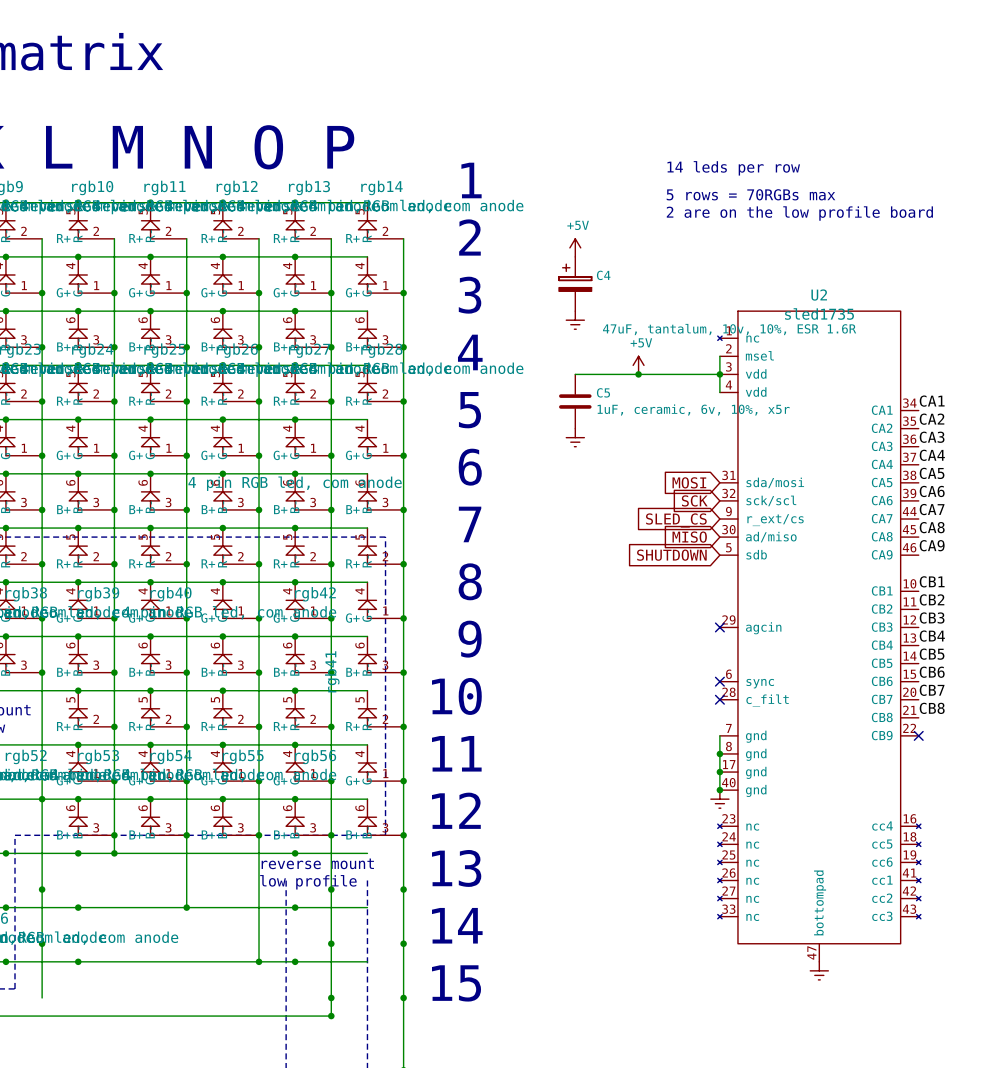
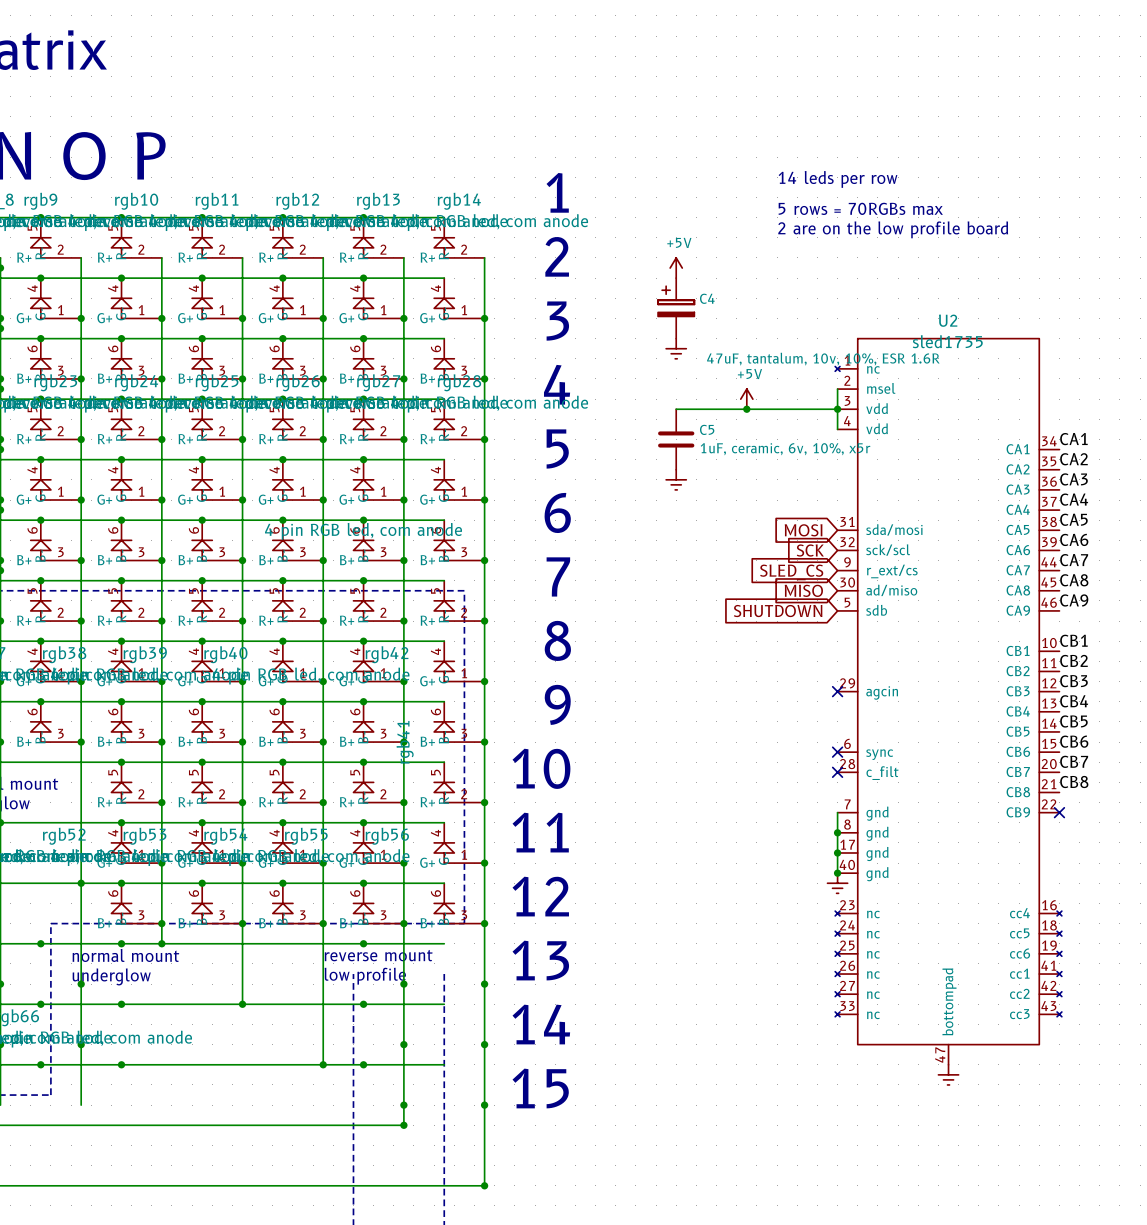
text: none -> normal mount (125, 955)
text: none -> underglow (111, 976)

